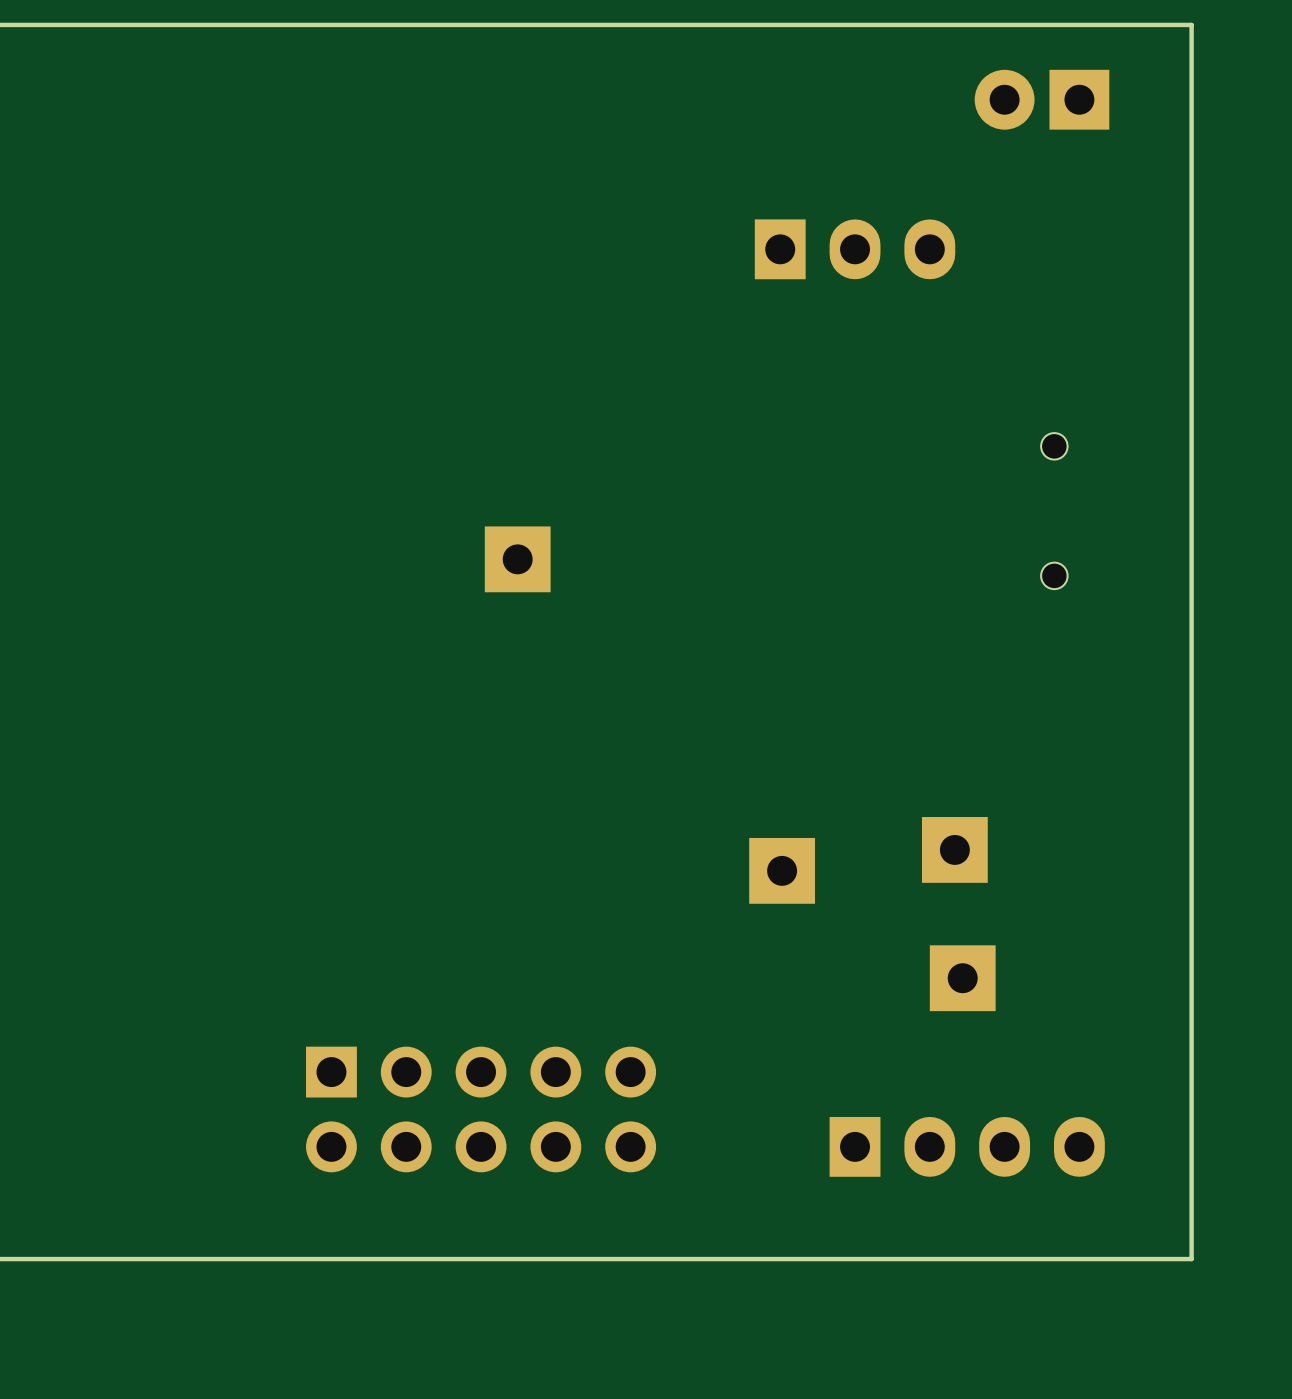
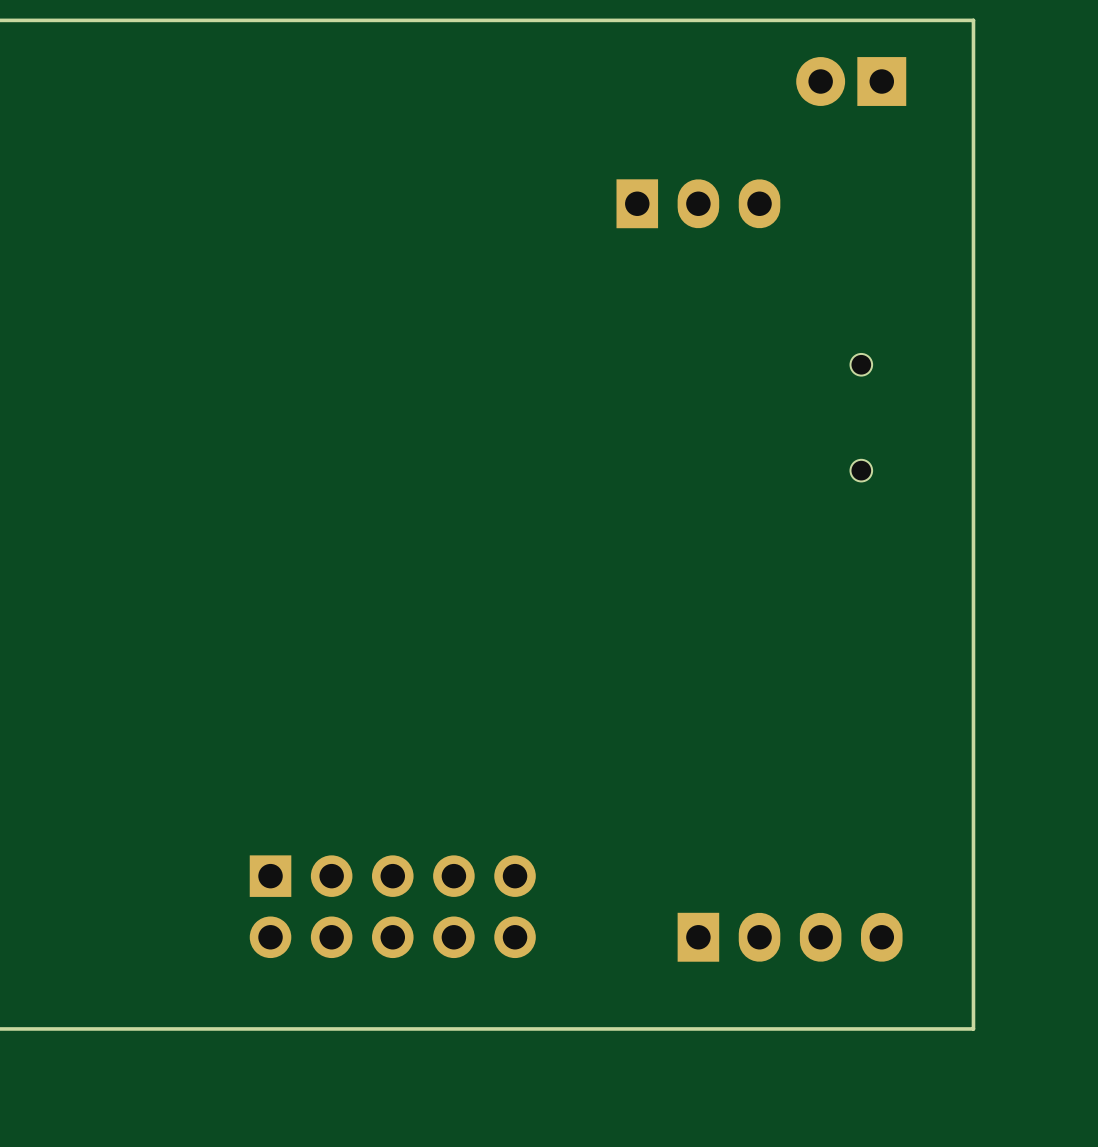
part: (517, 559) -> none
part: (954, 849) -> none
part: (782, 870) -> none
part: (962, 978) -> none

